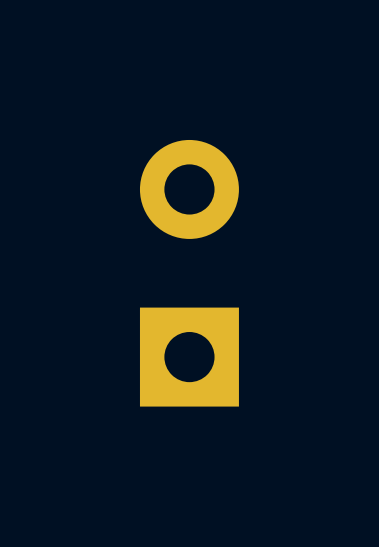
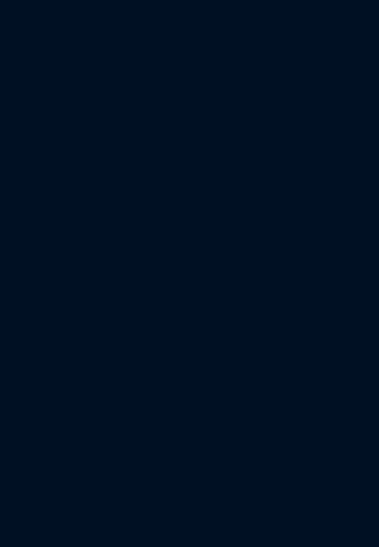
part: (189, 273) -> none

